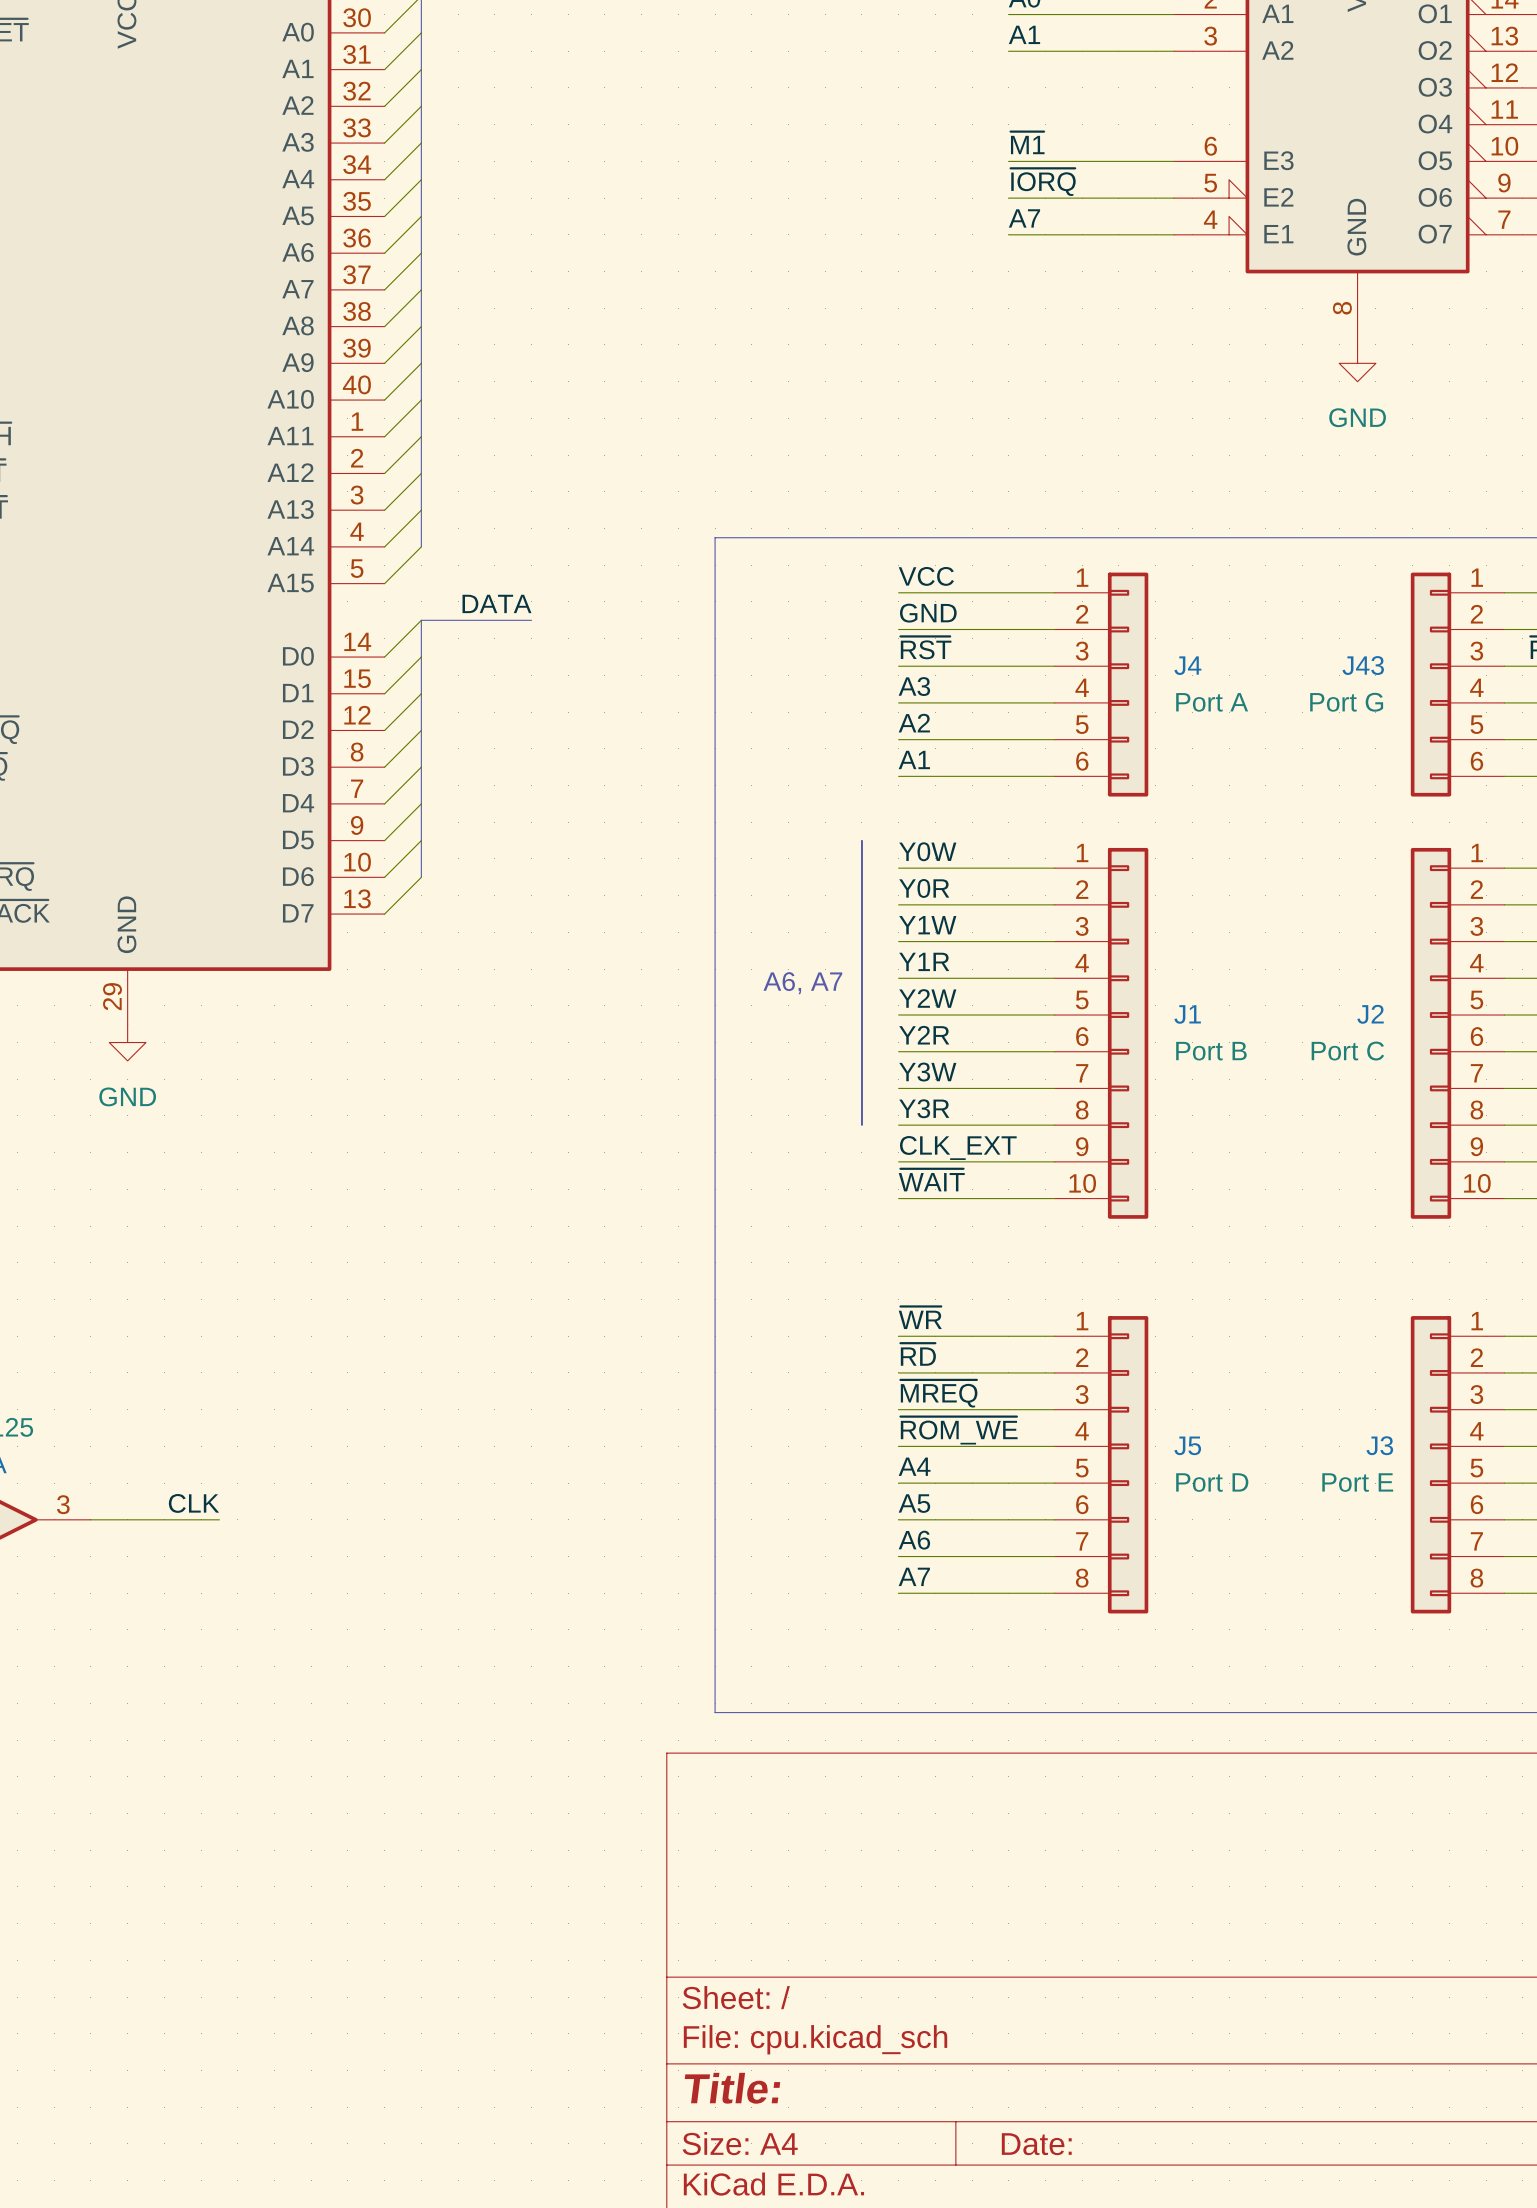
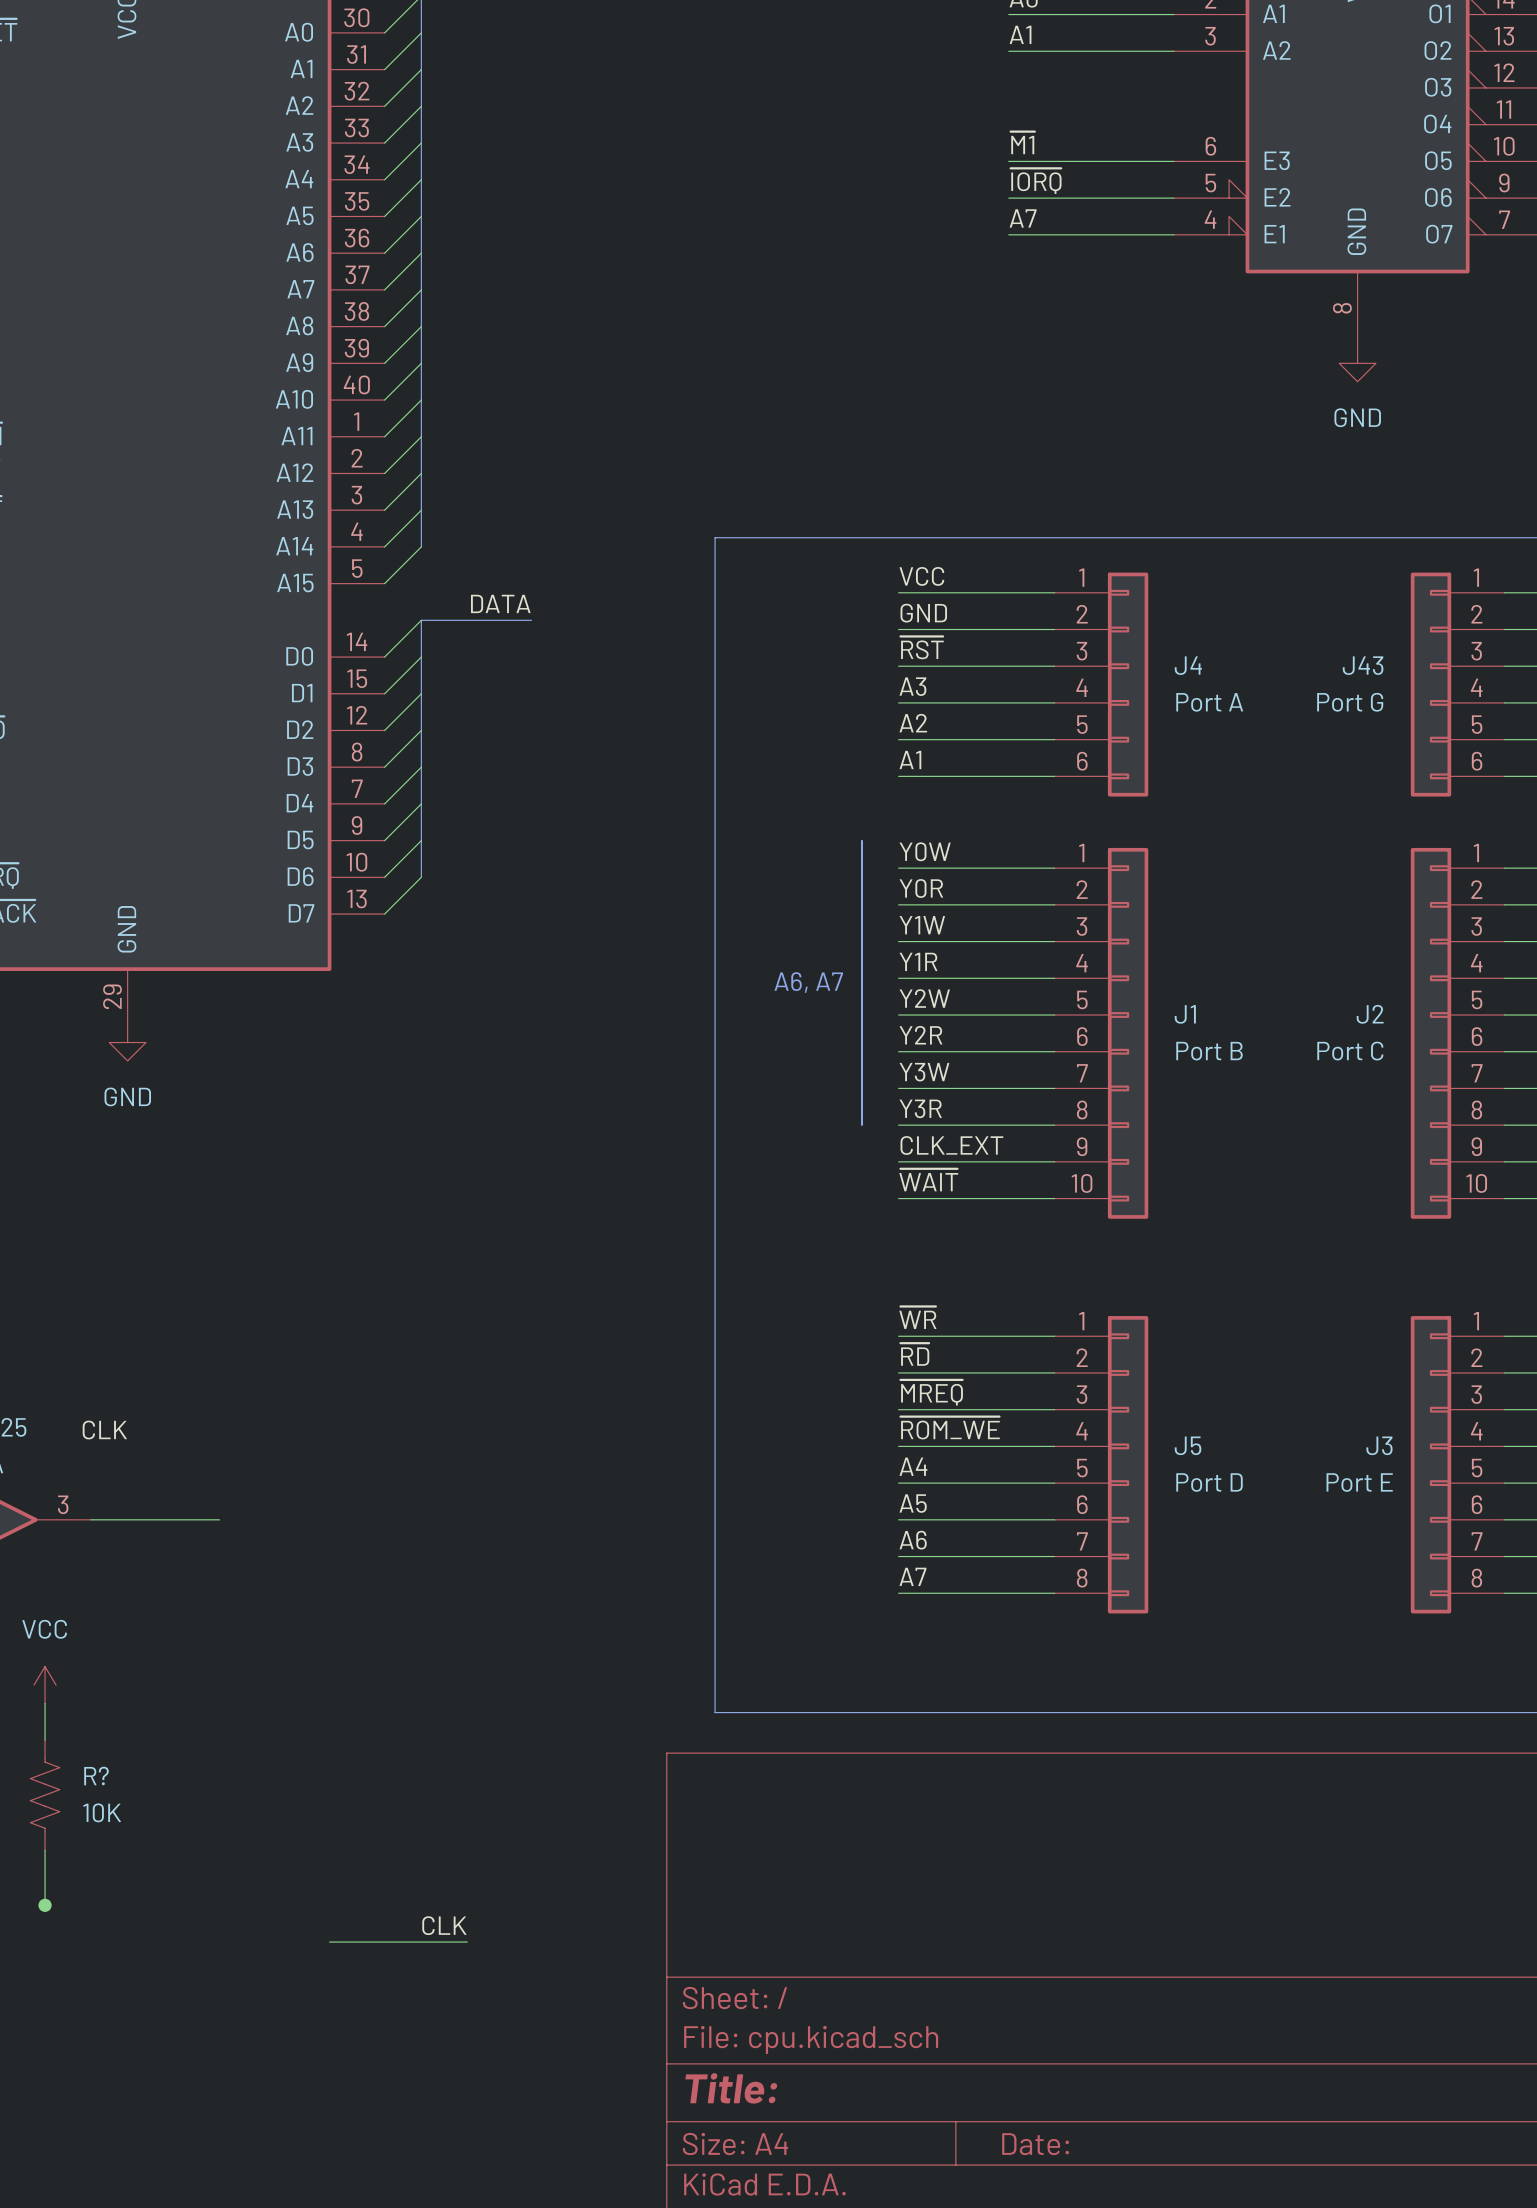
label position: CLK (194, 1503) -> CLK (104, 1430)
power symbol: none -> VCC (45, 1685)
wire: none -> (45, 1703) (45, 1740)
R?: none -> 10K (45, 1795)
wire: none -> (45, 1850) (45, 1905)
junction: none -> (45, 1905)
label: none -> CLK (444, 1925)
wire: none -> (329, 1942) (467, 1942)

